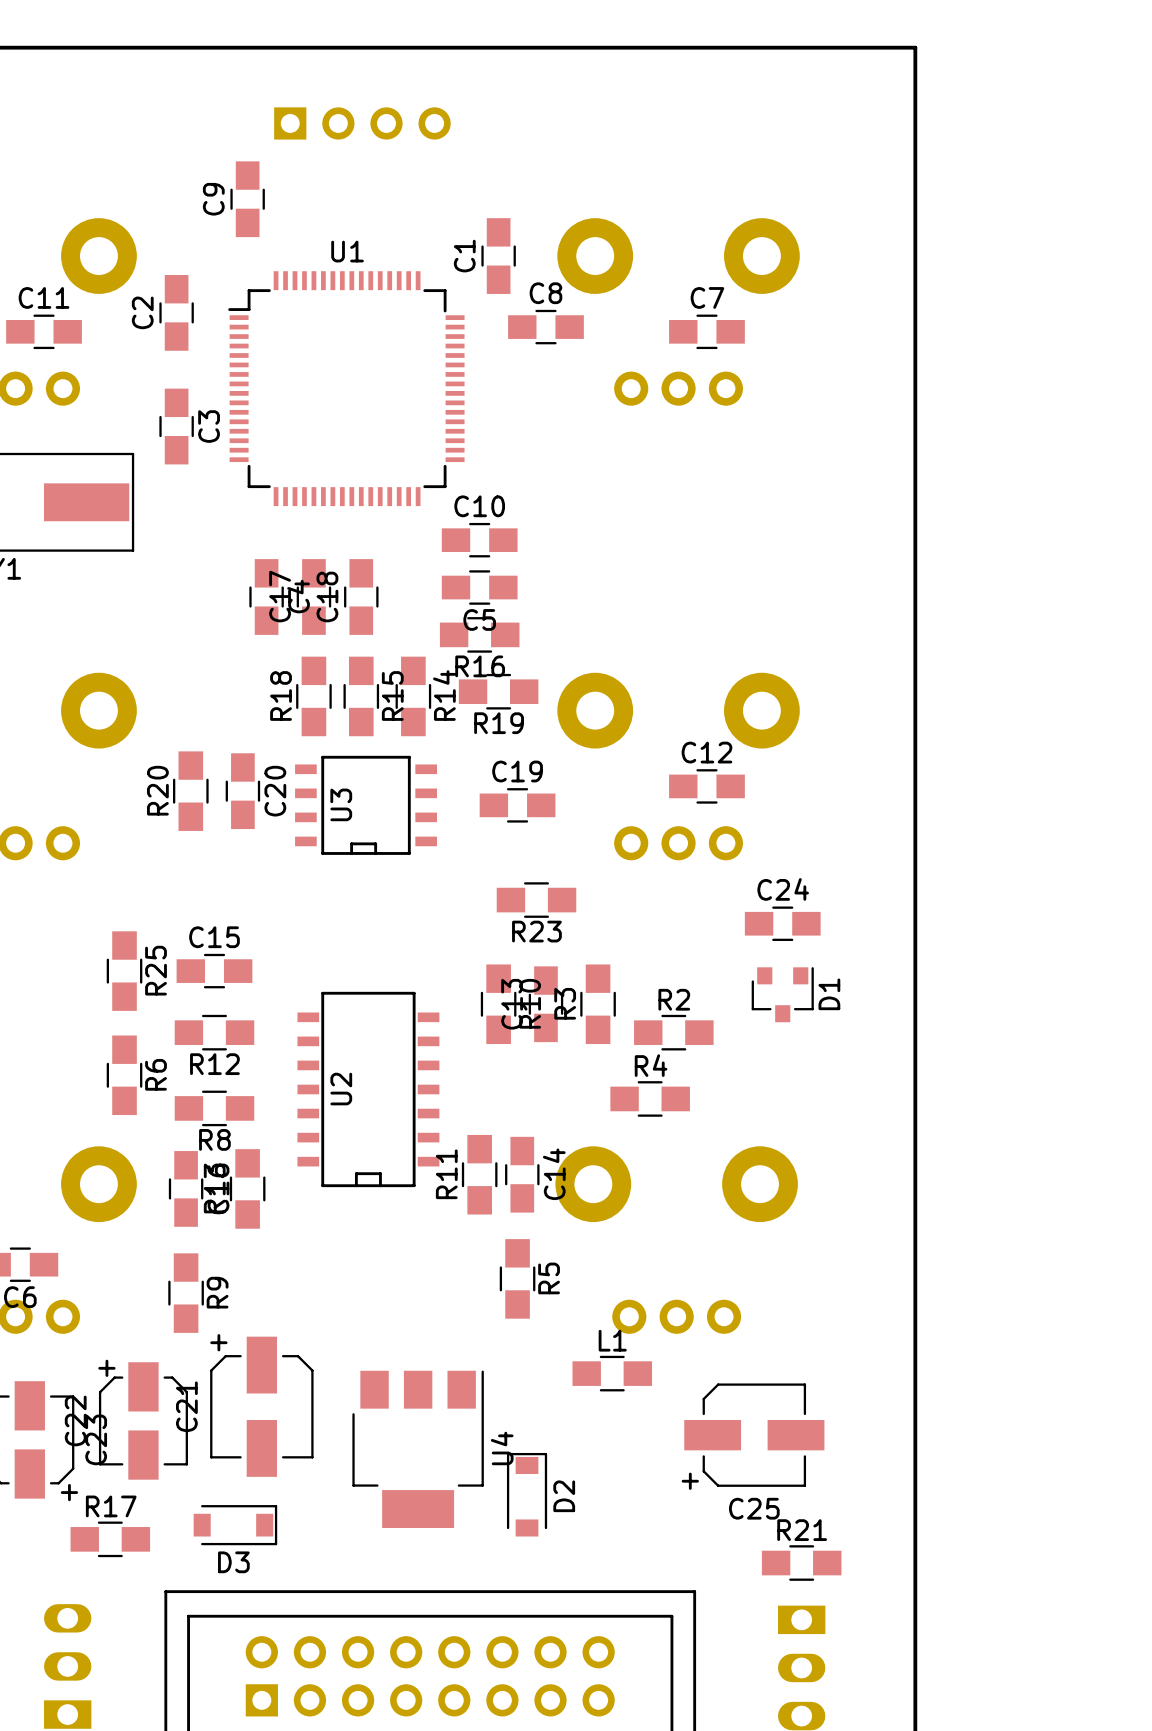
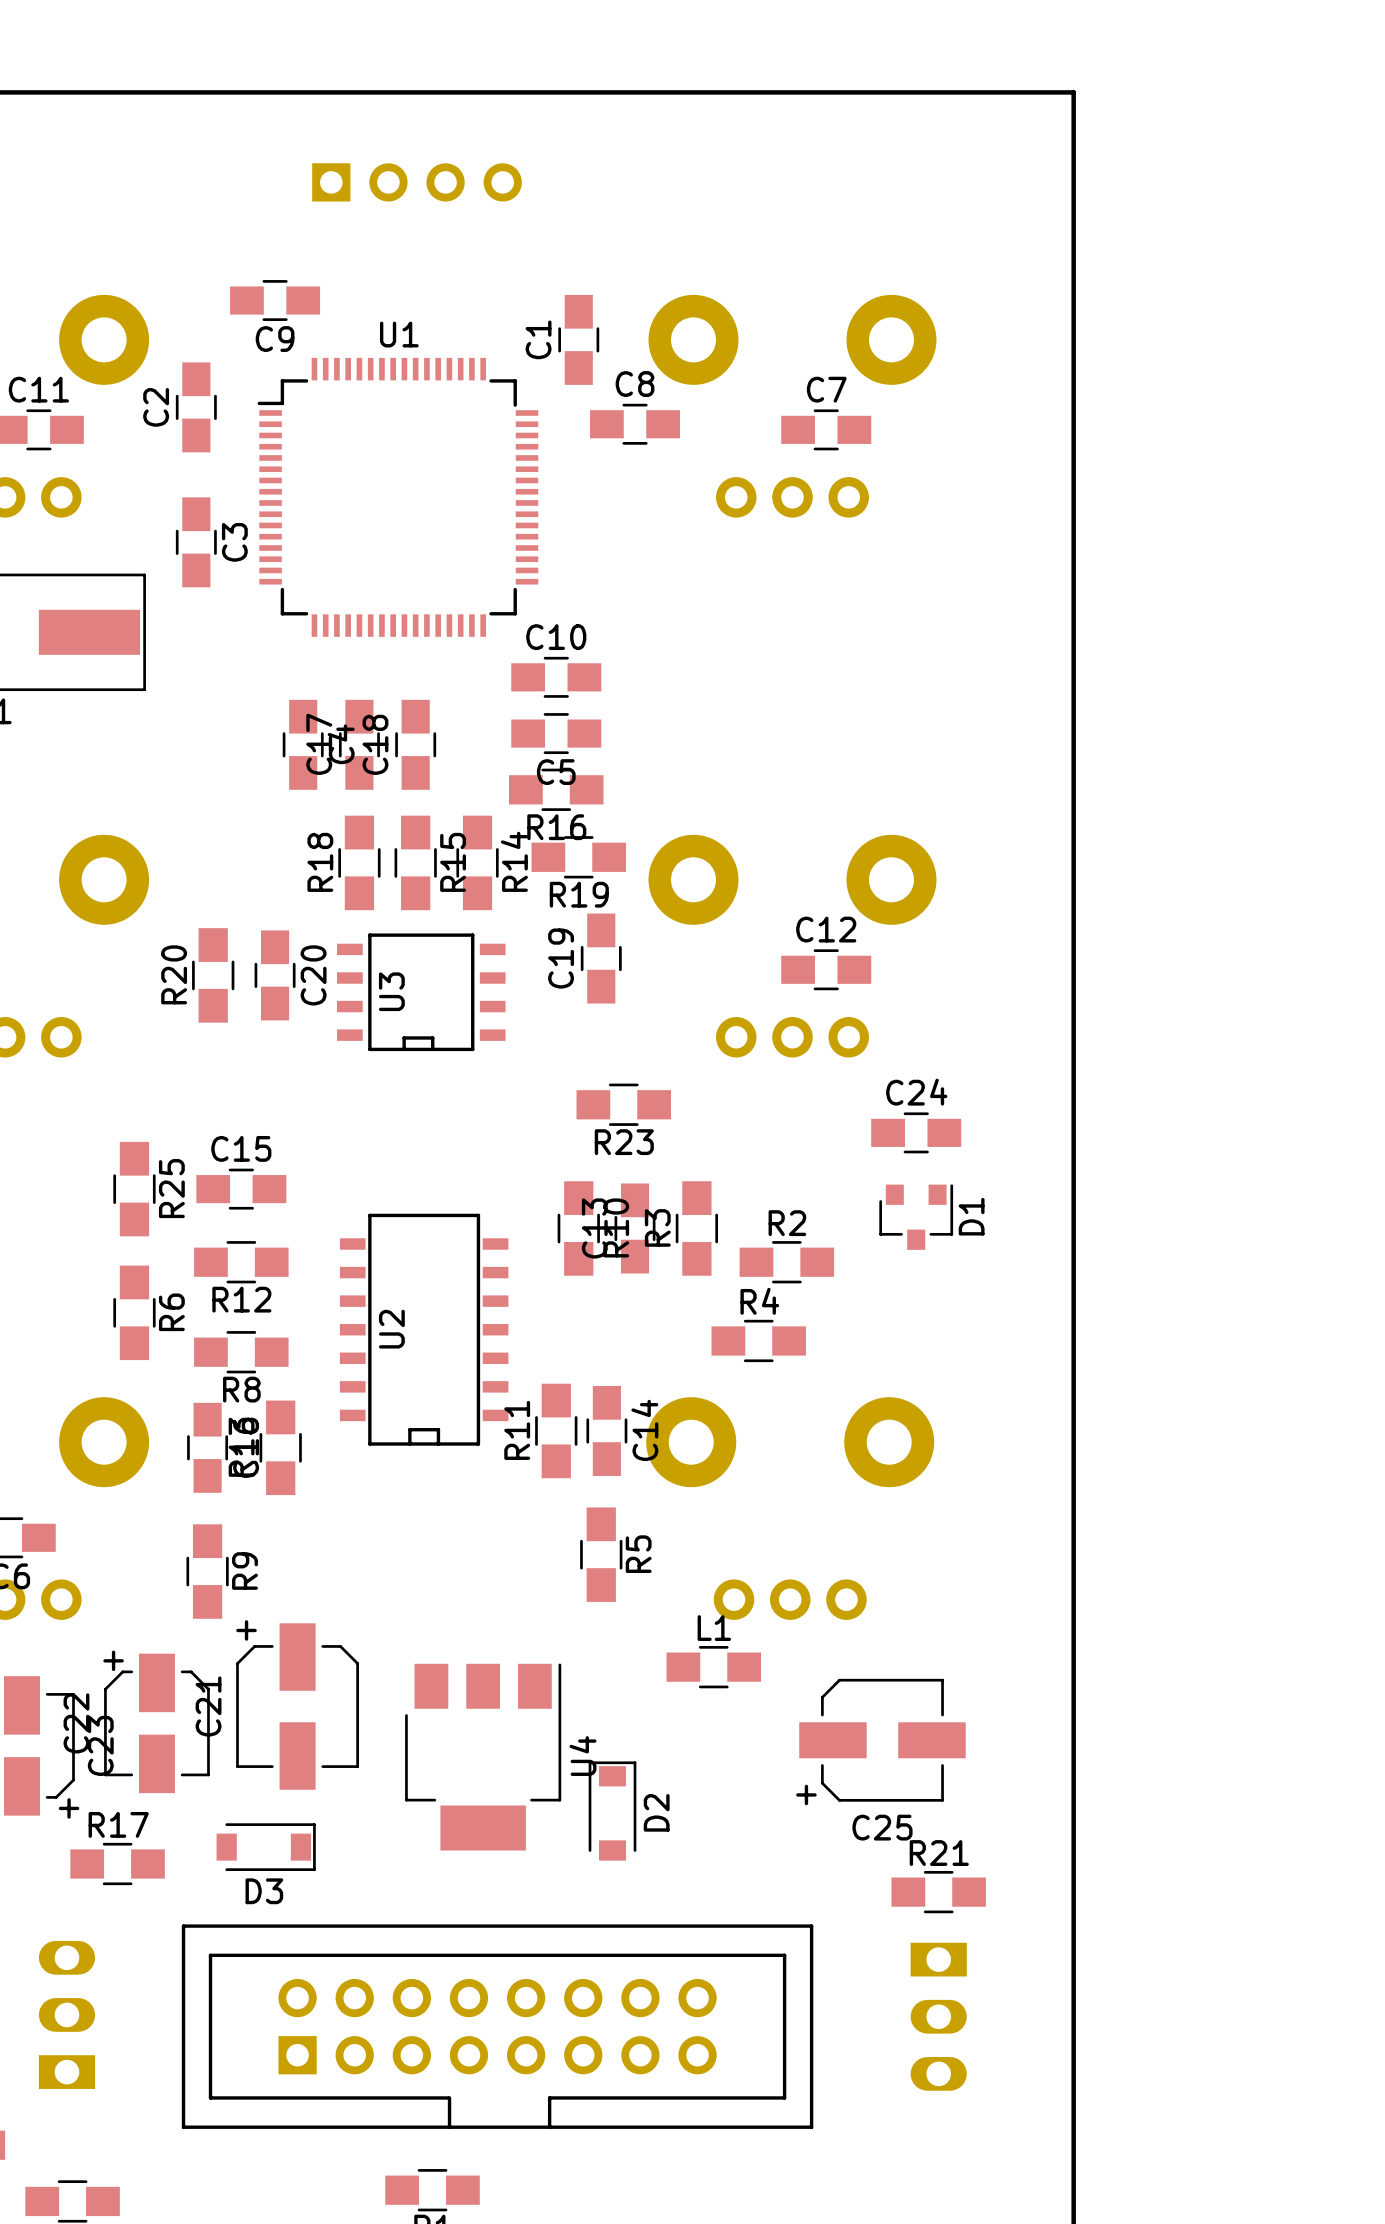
C9 name position: C9 (213, 199) -> C9 (275, 339)
C9 rotation: 0° (247, 199) -> 90° clockwise (275, 300)
C19 name position: C19 (517, 771) -> C19 (561, 958)
C19 rotation: 0° (517, 805) -> 90° clockwise (601, 958)

